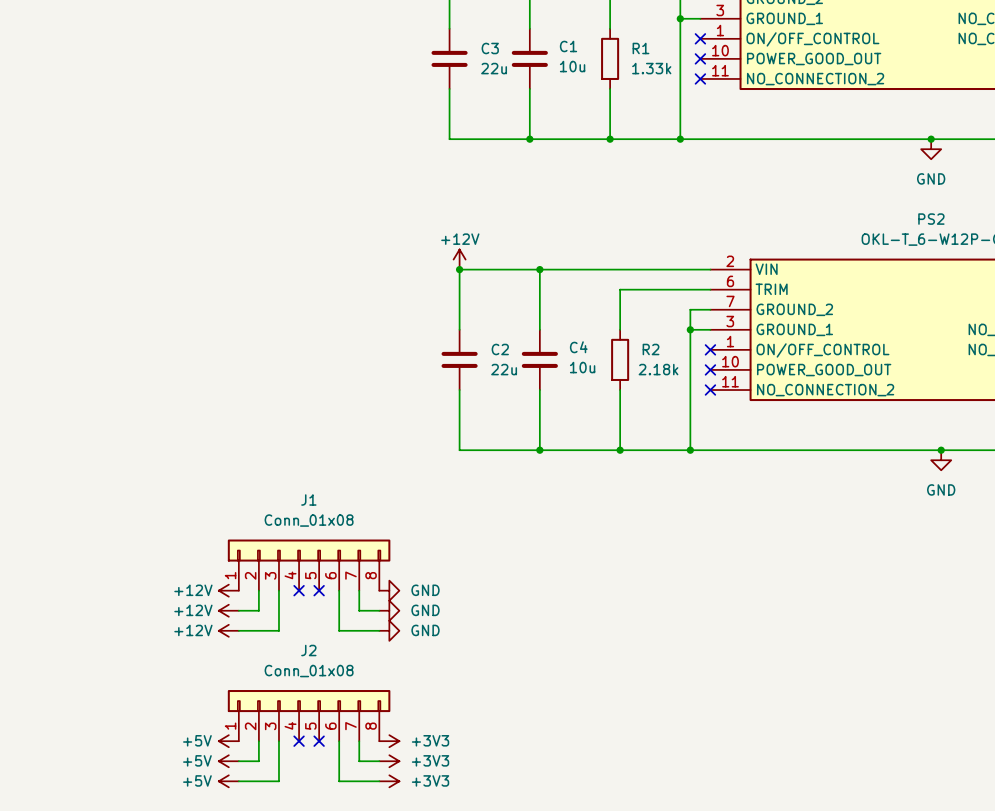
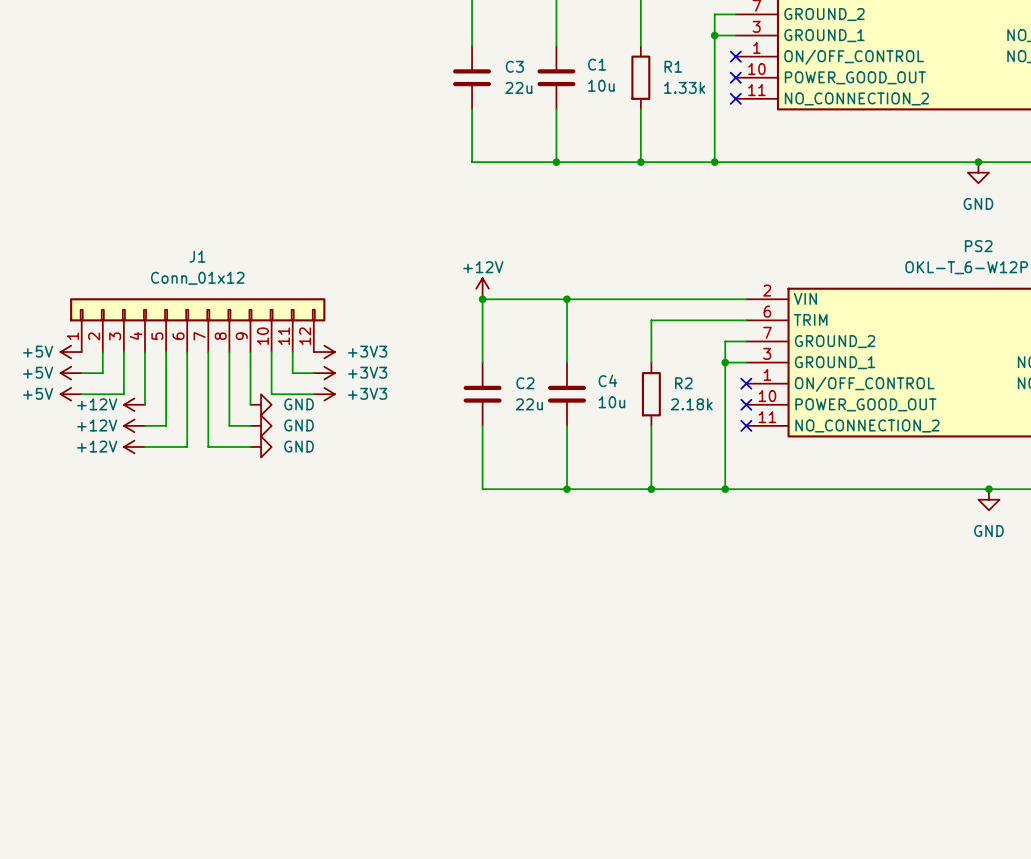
power symbol: none -> +5V (71, 352)
wire: none -> (102, 352) (102, 373) (81, 373)
wire: none -> (123, 352) (123, 394) (81, 394)
wire: none -> (145, 352) (145, 404)
wire: none -> (166, 352) (166, 425) (145, 425)
wire: none -> (187, 352) (187, 446) (145, 446)
wire: none -> (208, 352) (208, 446) (250, 446)
wire: none -> (229, 352) (229, 425) (250, 425)
wire: none -> (250, 352) (250, 404)
wire: none -> (271, 352) (271, 394) (313, 394)
wire: none -> (292, 352) (292, 373) (313, 373)
power symbol: none -> +3V3 (324, 352)
power symbol: none -> +5V (71, 373)
power symbol: none -> +3V3 (324, 373)
power symbol: none -> +5V (71, 394)
power symbol: none -> +3V3 (324, 394)
power symbol: none -> +12V (134, 404)
power symbol: none -> GND (261, 404)
power symbol: none -> +12V (134, 425)
power symbol: none -> GND (261, 425)
power symbol: none -> +12V (134, 446)
power symbol: none -> GND (261, 446)
J1 value: Conn_01x08 (309, 520) -> Conn_01x12 (197, 278)
J1 symbol: [227, 539, 391, 591] -> [70, 298, 326, 353]
power symbol: +12V (228, 590) -> none
wire: (258, 590) (258, 610) (238, 610) -> none
wire: (278, 590) (278, 630) (238, 630) -> none
no-connect mark: (299, 590) -> none
no-connect mark: (319, 590) -> none
wire: (339, 590) (339, 630) (379, 630) -> none
wire: (359, 590) (359, 610) (379, 610) -> none
power symbol: GND (389, 590) -> none
power symbol: +12V (228, 610) -> none
power symbol: GND (389, 610) -> none
power symbol: +12V (228, 630) -> none
power symbol: GND (389, 630) -> none
J2: Conn_01x08 (309, 715) -> none
power symbol: +5V (228, 741) -> none
wire: (258, 741) (258, 761) (238, 761) -> none
wire: (278, 741) (278, 781) (238, 781) -> none
no-connect mark: (299, 741) -> none
no-connect mark: (319, 741) -> none
wire: (339, 741) (339, 781) (379, 781) -> none
wire: (359, 741) (359, 761) (379, 761) -> none
power symbol: +3V3 (389, 741) -> none
power symbol: +5V (228, 761) -> none
power symbol: +3V3 (389, 761) -> none
power symbol: +5V (228, 781) -> none
power symbol: +3V3 (389, 781) -> none

